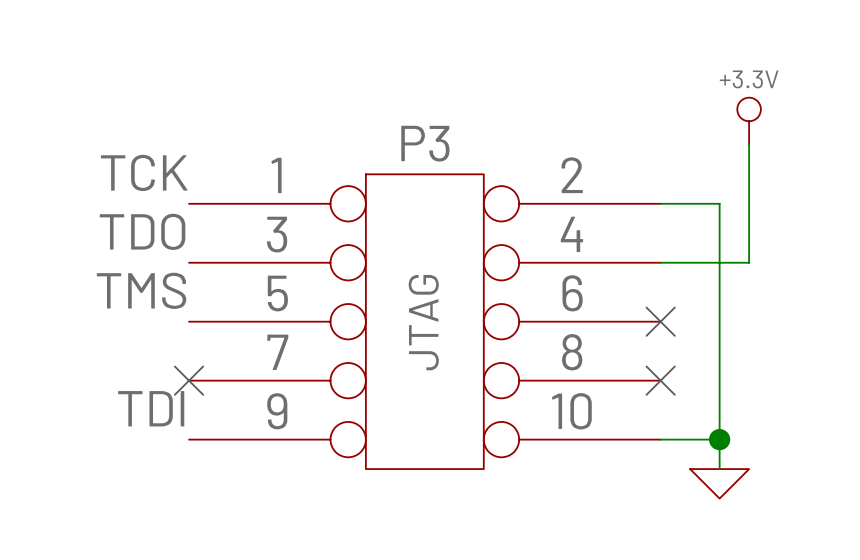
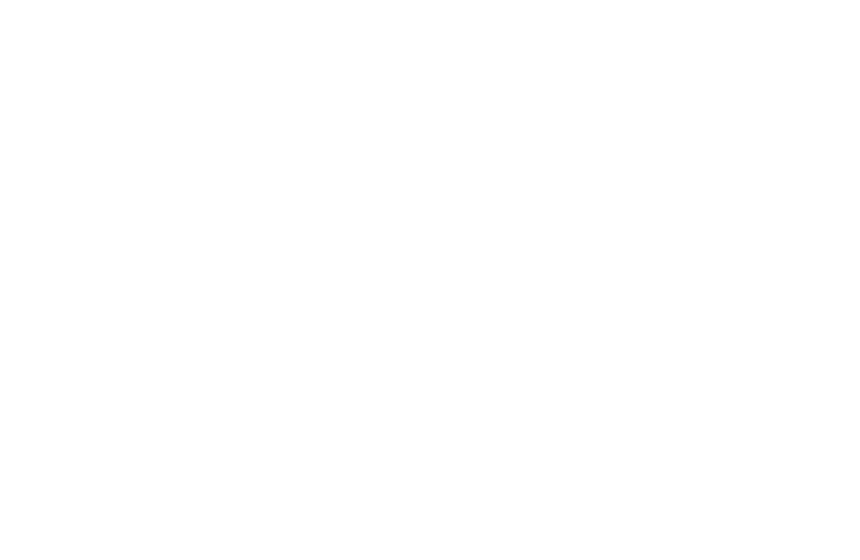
power symbol: +3.3V (749, 121) -> none
wire: (749, 144) (749, 262) (660, 262) -> none
label: TCK (144, 172) -> none
wire: (660, 203) (719, 203) (719, 469) -> none
label: TDO (142, 231) -> none
label: TMS (141, 290) -> none
P3: JTAG (424, 321) -> none
no-connect mark: (660, 321) -> none
no-connect mark: (189, 380) -> none
no-connect mark: (660, 380) -> none
label: TDI (151, 408) -> none
wire: (660, 439) (719, 439) -> none
junction: (719, 439) -> none
power symbol: (719, 483) -> none

